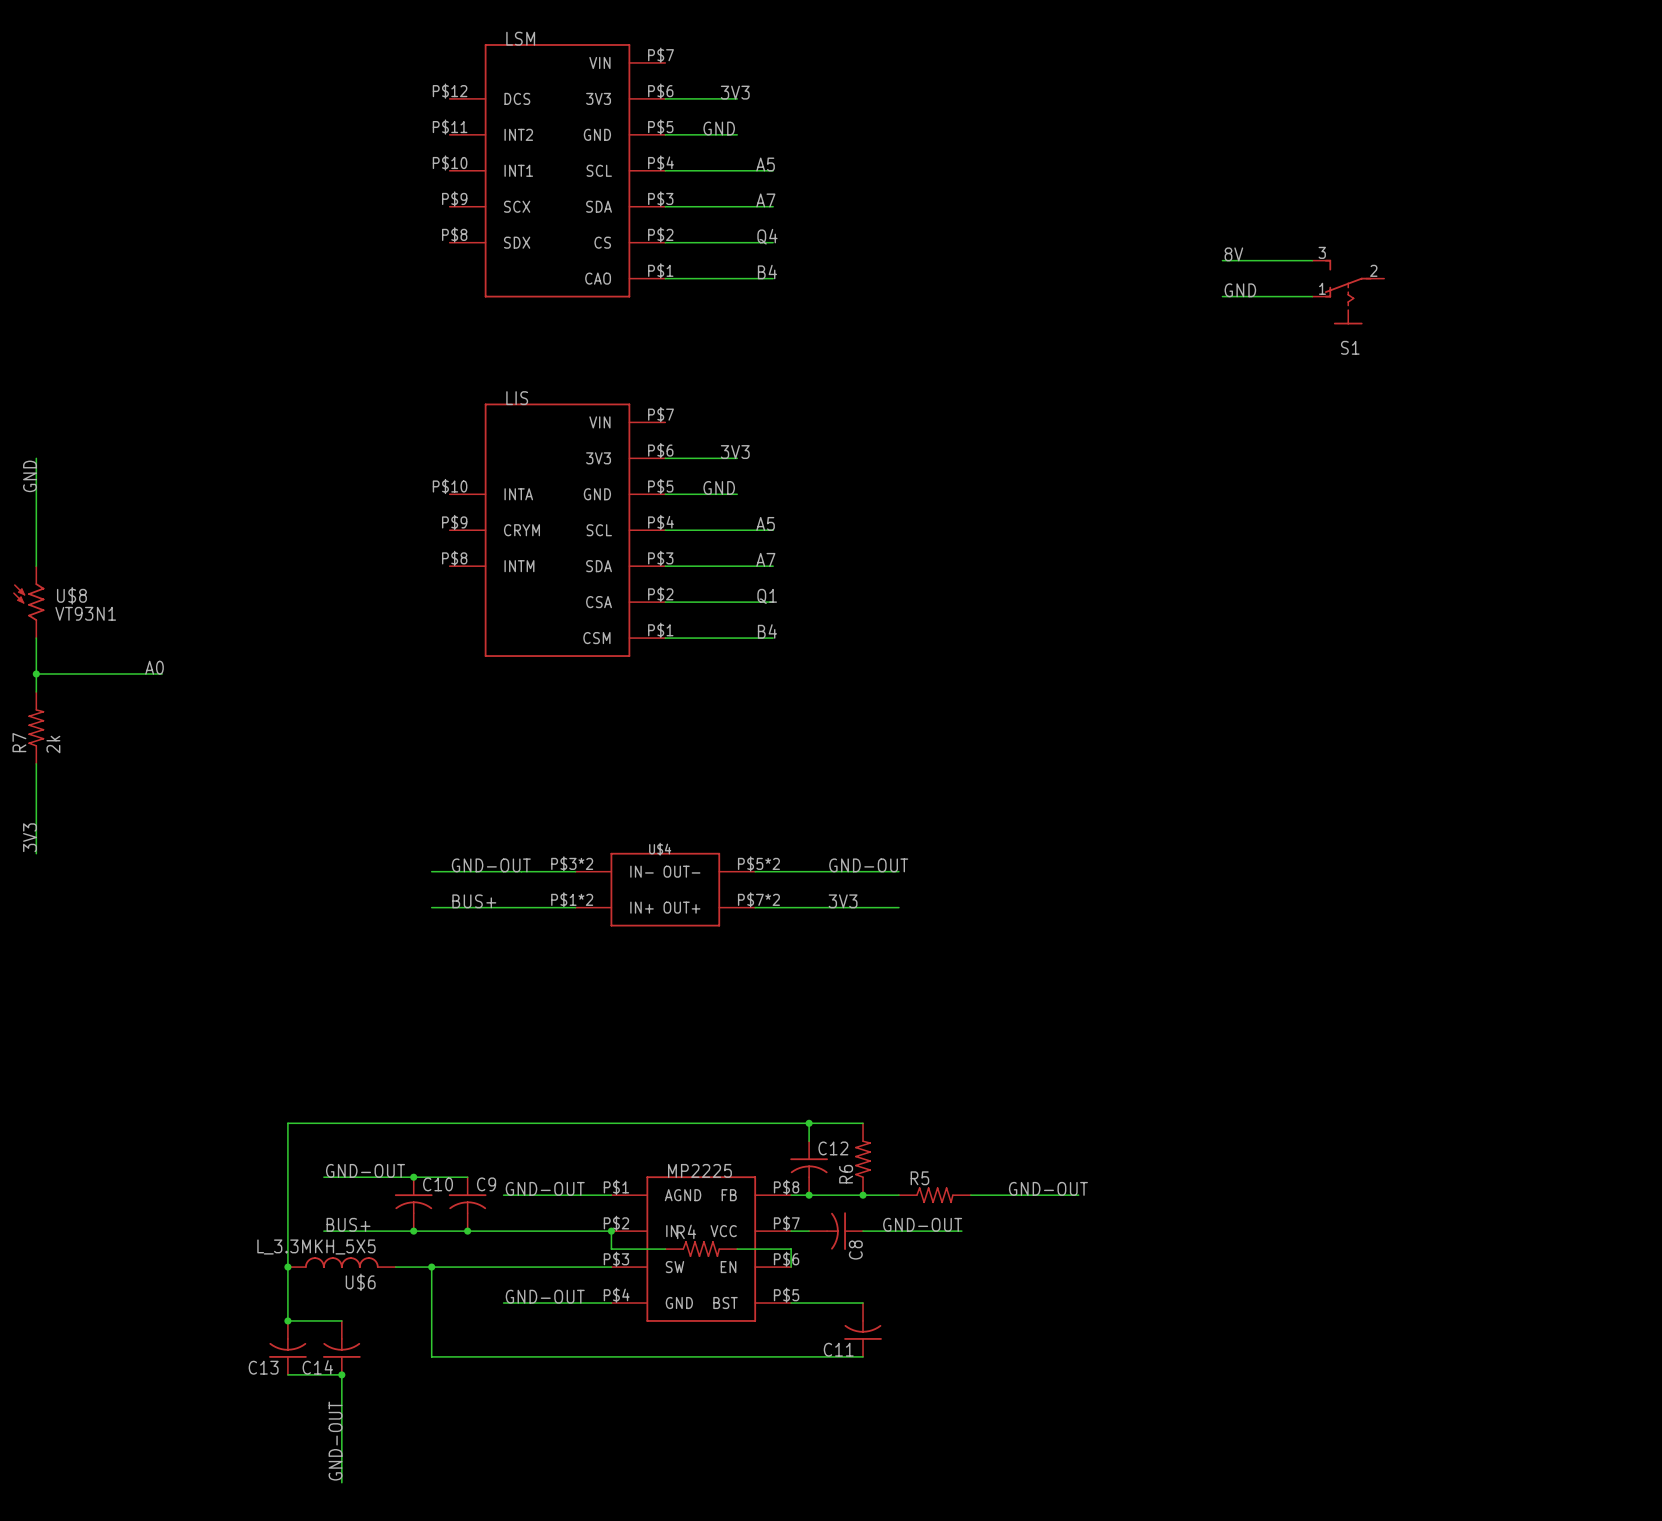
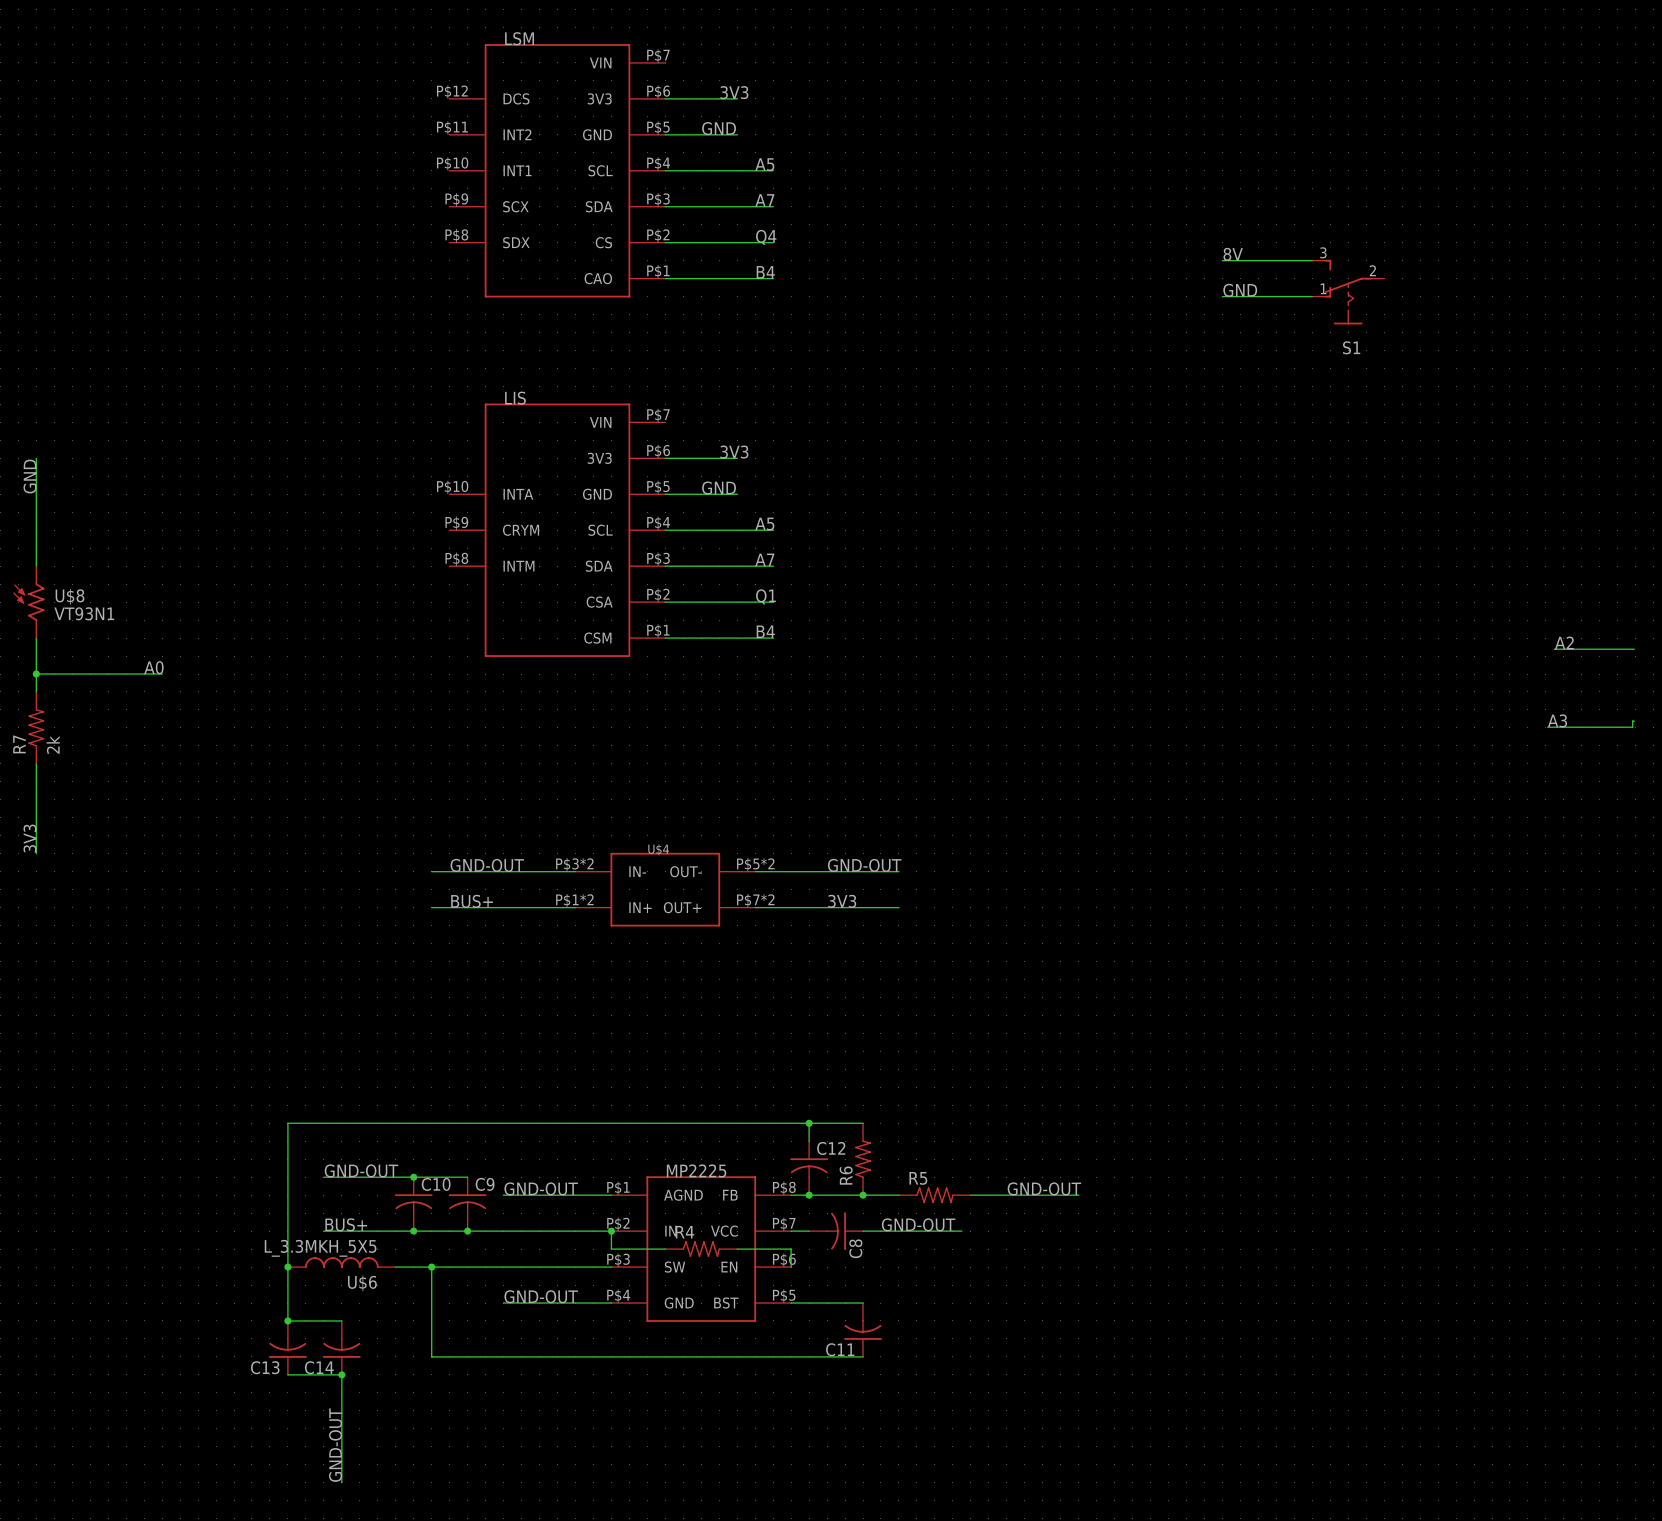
label: none -> A2 (1564, 642)
wire: none -> (1554, 649) (1634, 649)
label: none -> A3 (1557, 720)
wire: none -> (1634, 721) (1632, 721) (1632, 727) (1547, 727)

